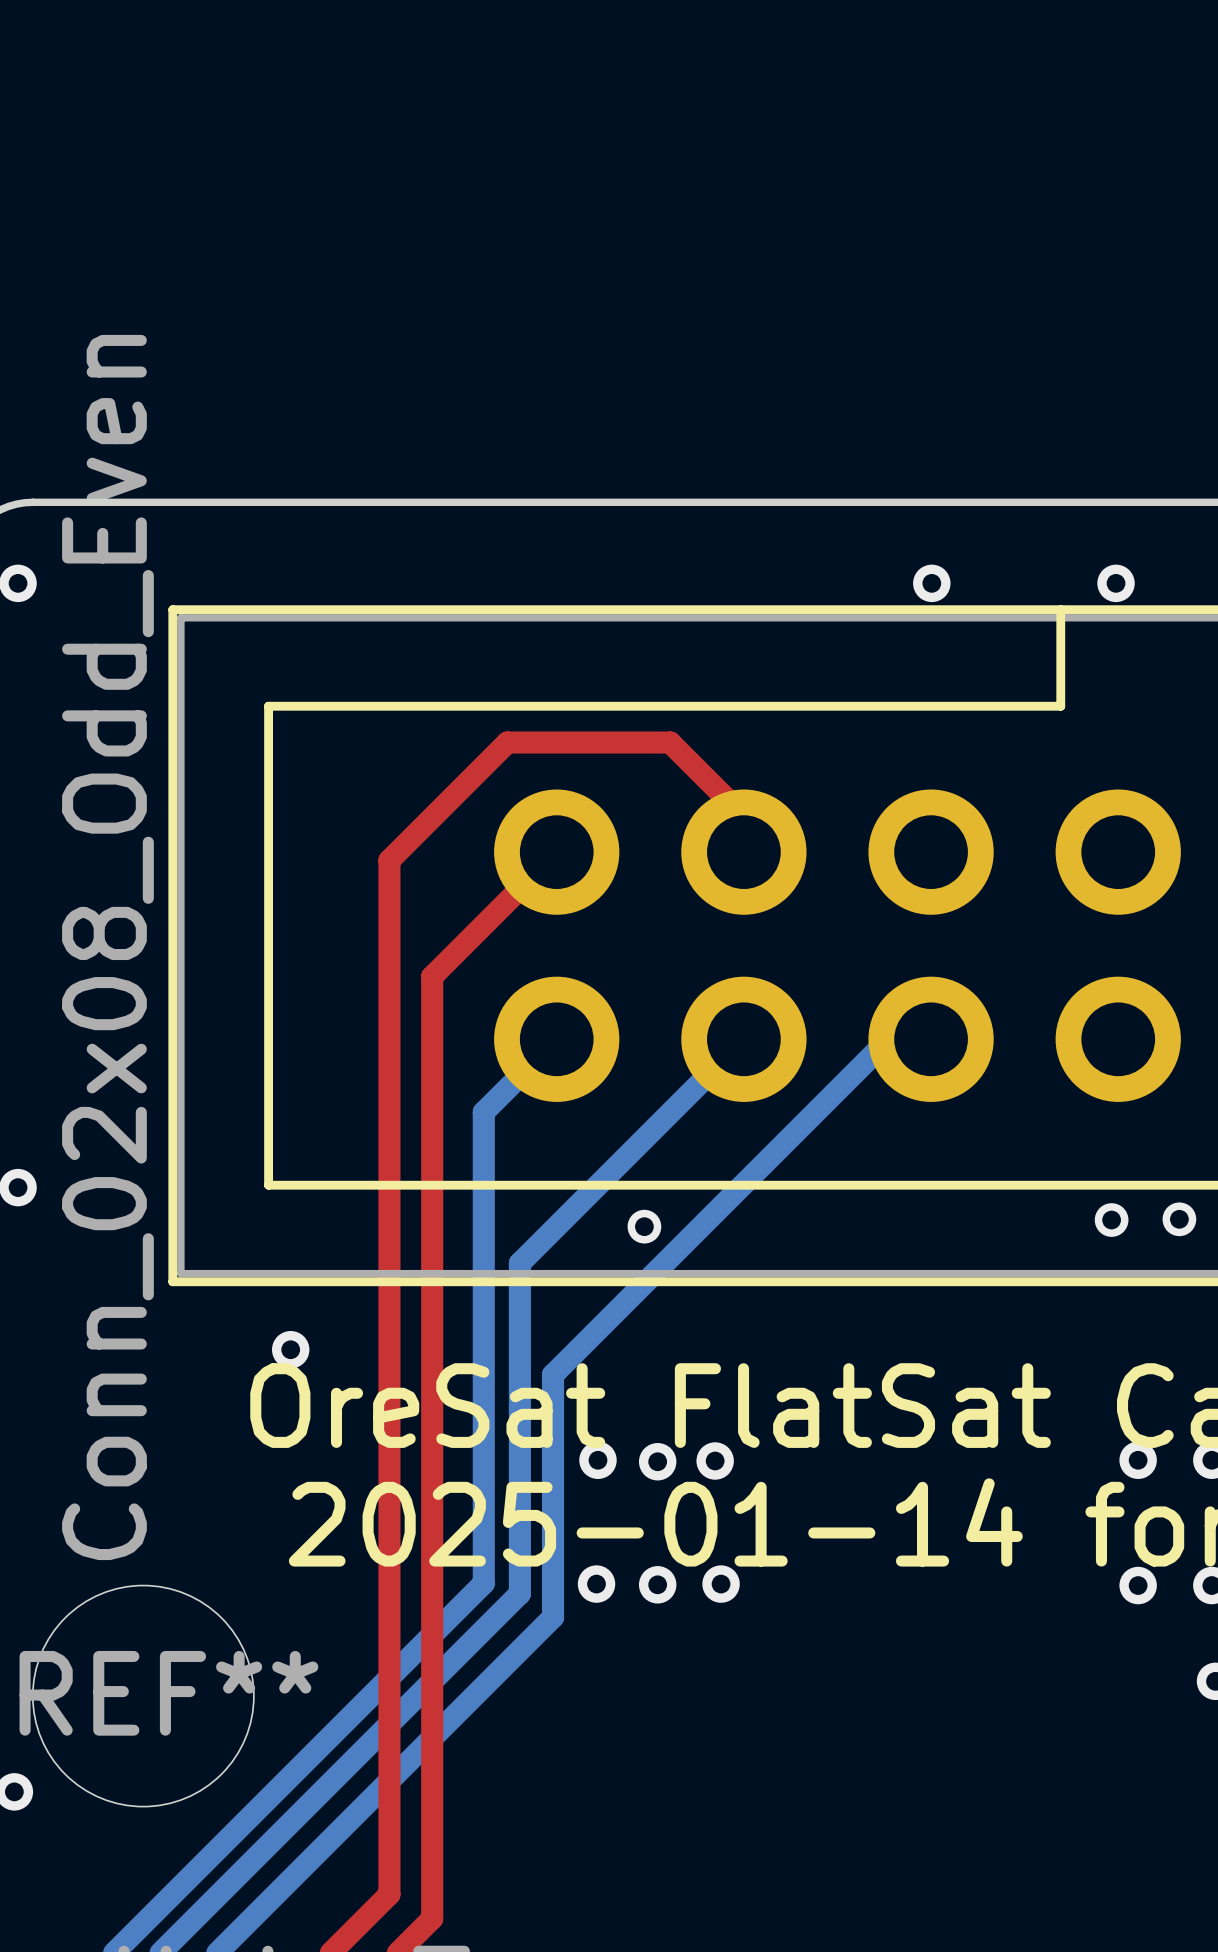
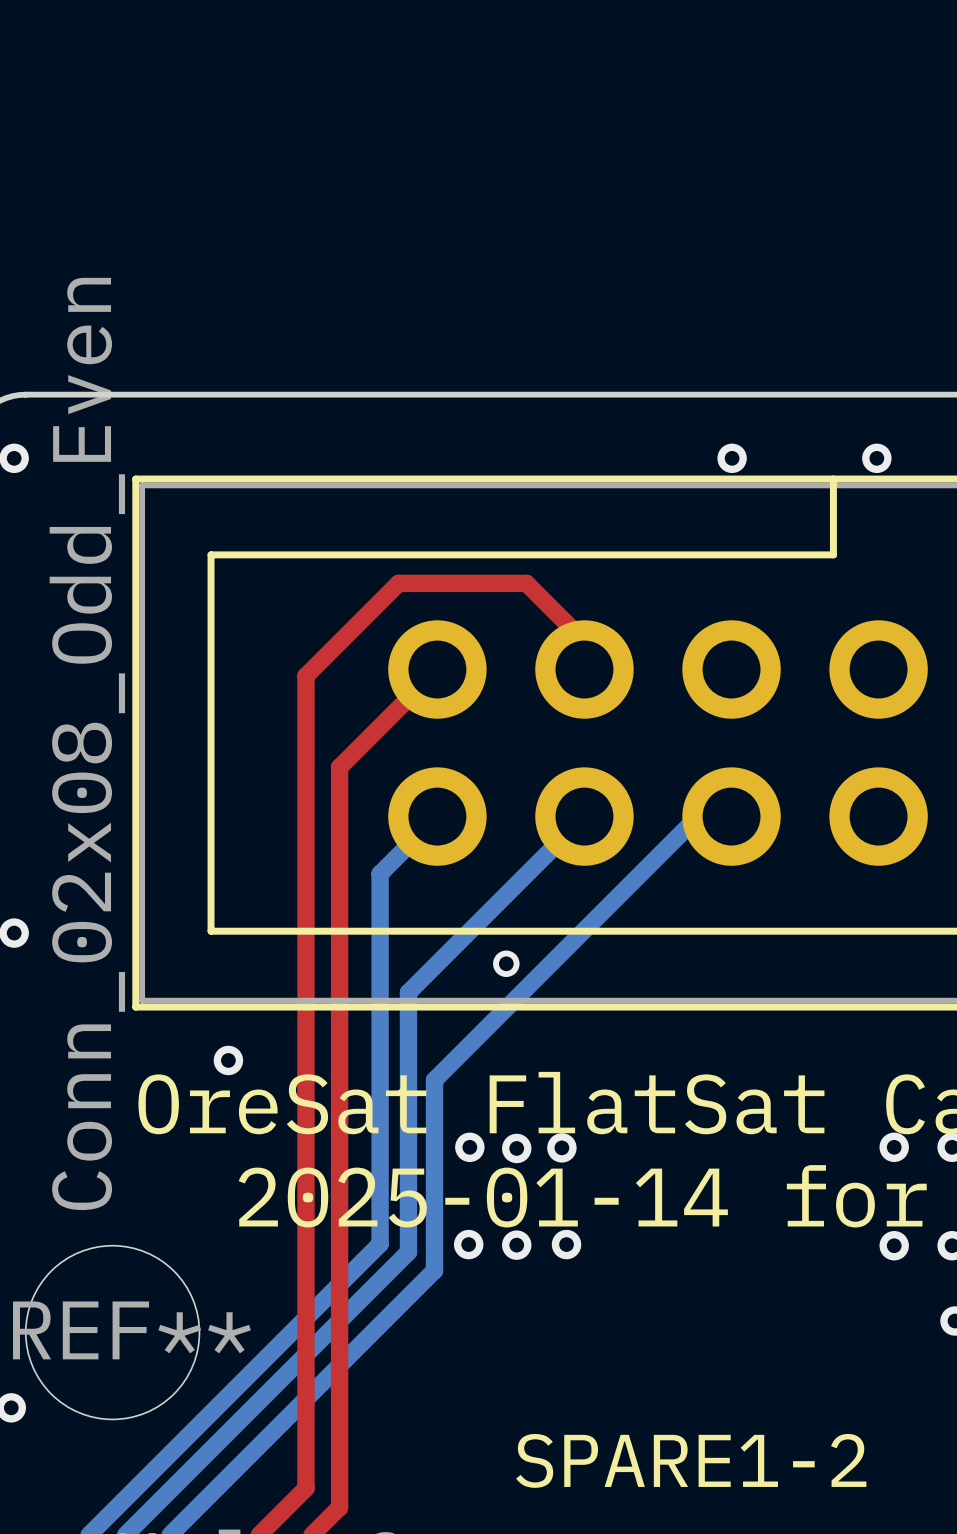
via: (1179, 1219) -> none
via: (1111, 1220) -> none
text: none -> SPARE1-2 (691, 1460)

